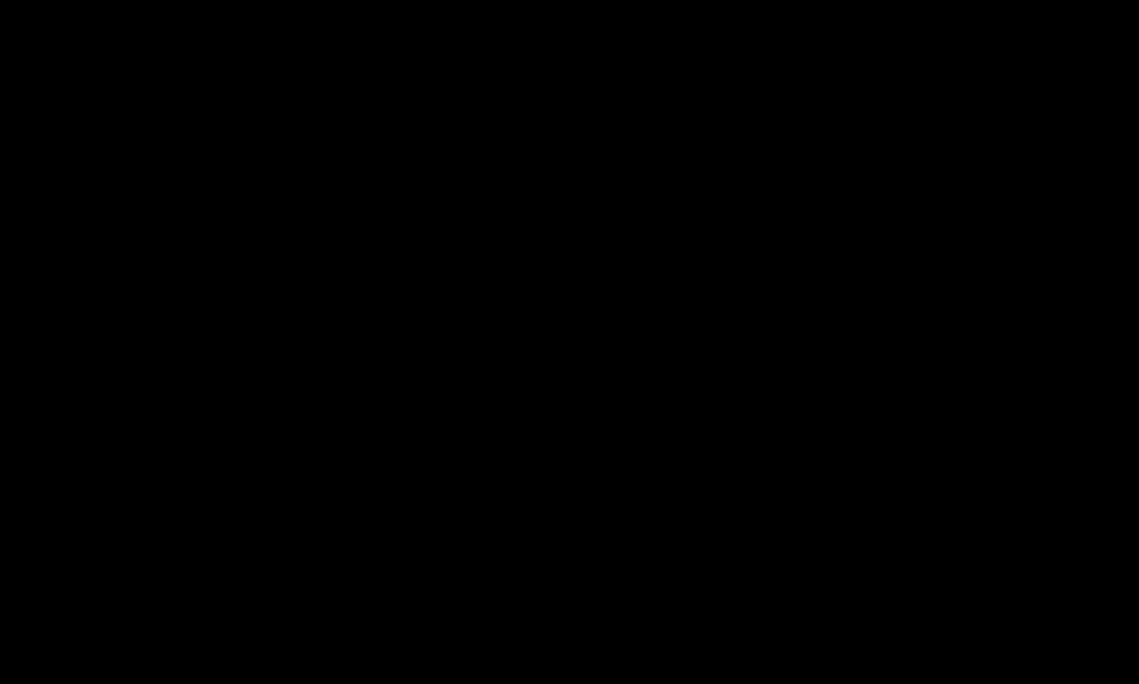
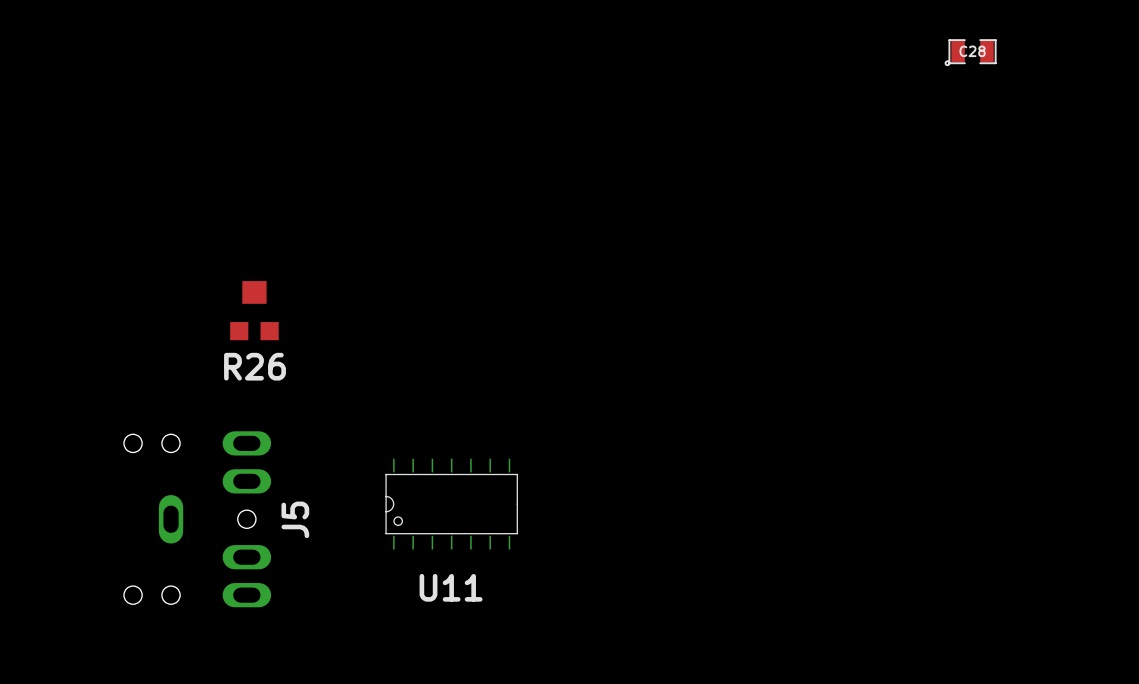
C28: none -> (970, 52)
R26: none -> (254, 310)
U11: none -> (451, 504)
J5: none -> (197, 519)

